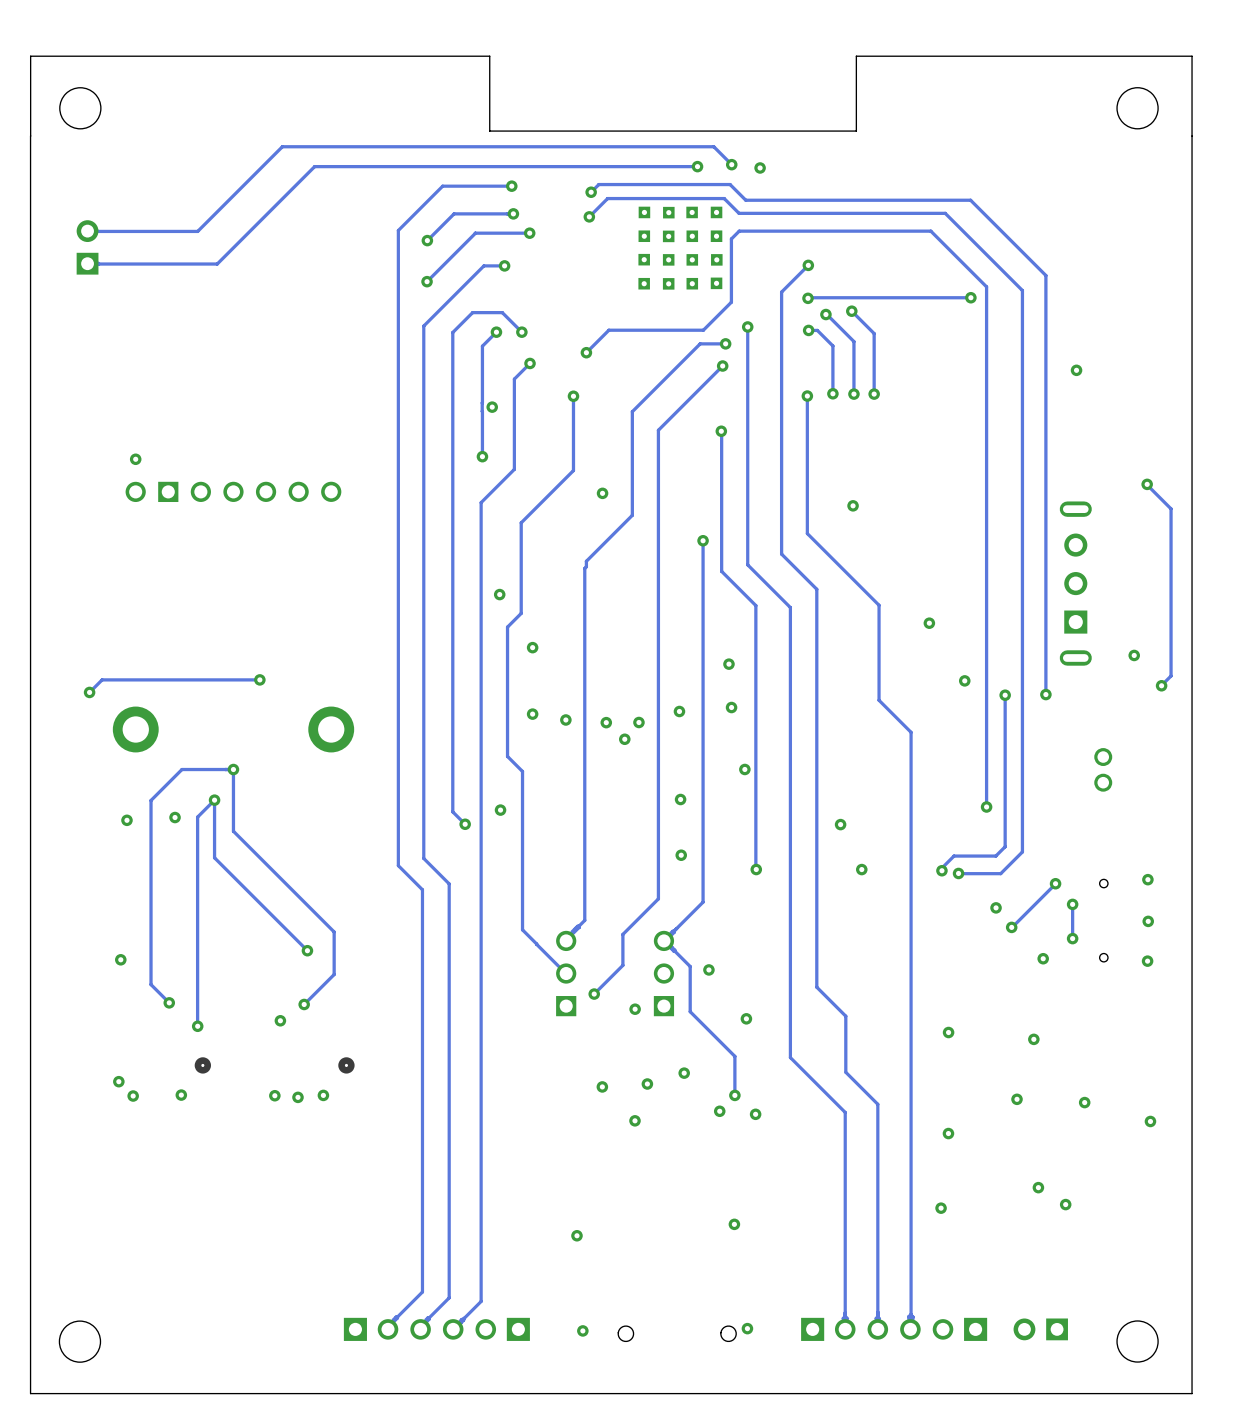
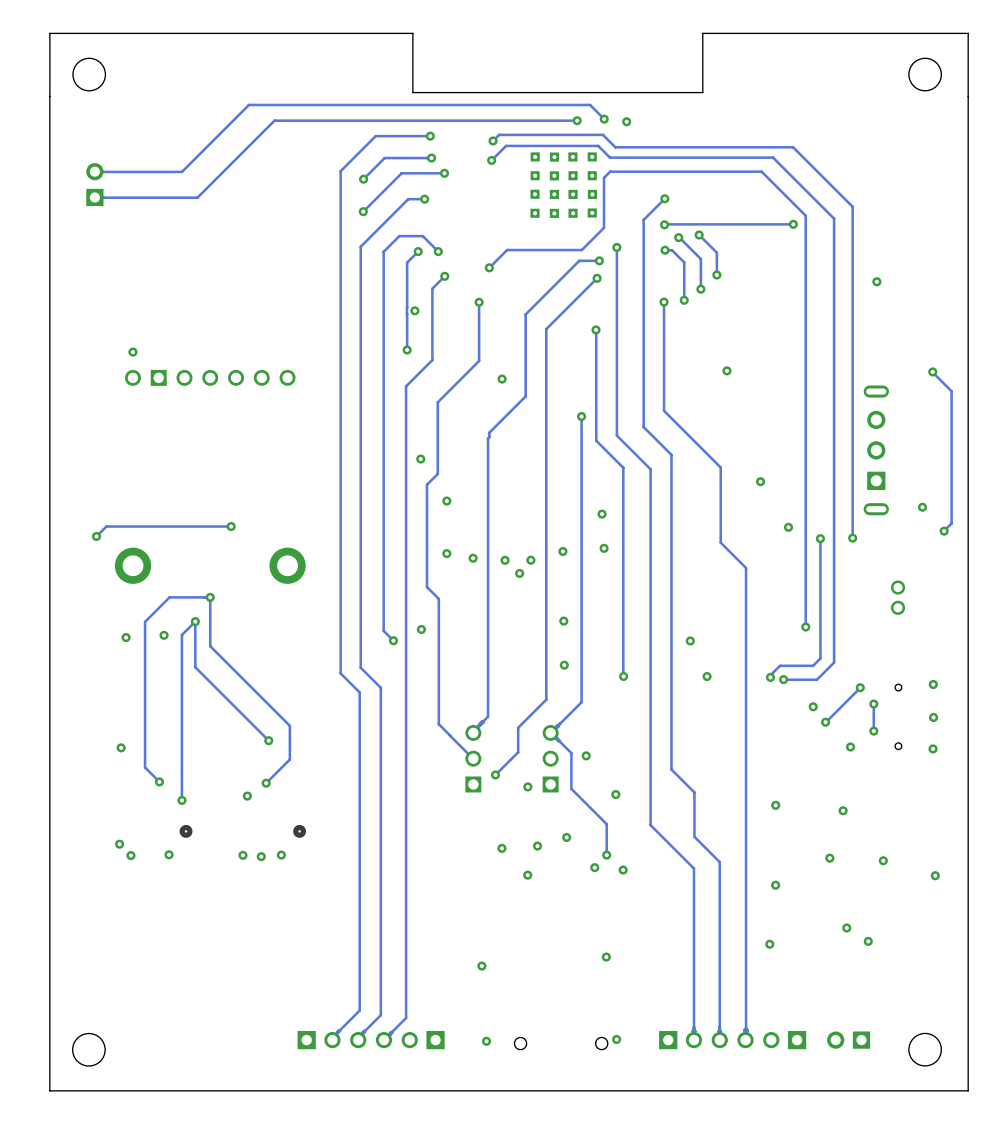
track: (874, 361) (874, 394) -> none
via: none -> (716, 275)
track: (853, 379) (853, 394) -> none
via: none -> (700, 289)
via: (853, 394) -> none
via: (874, 394) -> none
via position: (853, 505) -> (726, 370)
via: (744, 769) -> none

